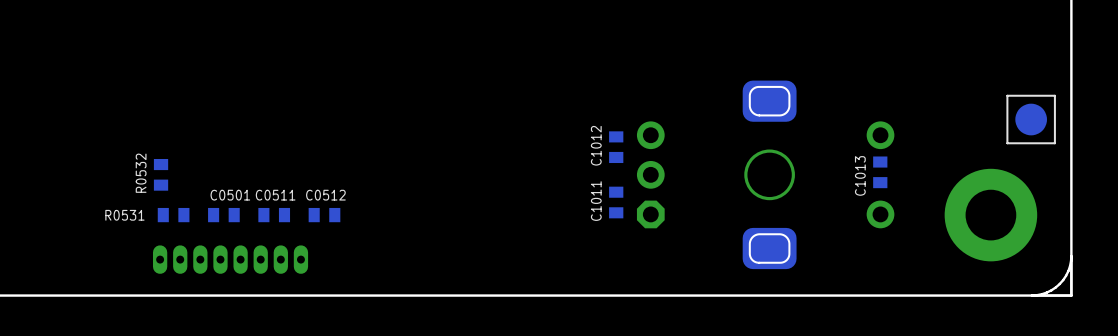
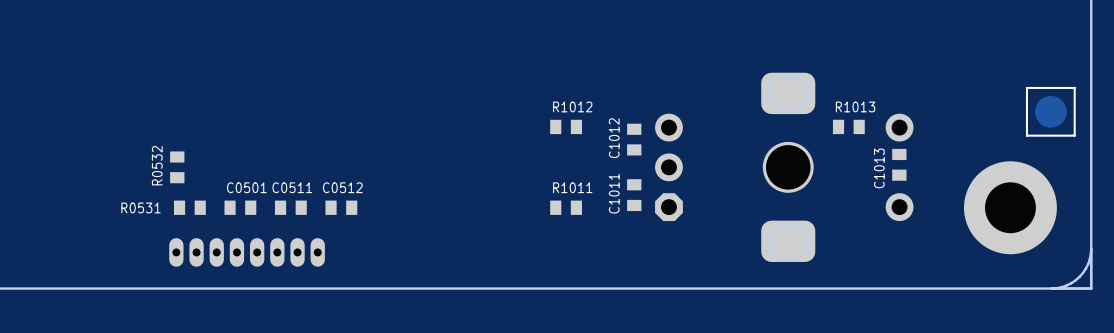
R1012: none -> (566, 126)
R1013: none -> (848, 126)
R1011: none -> (566, 207)

